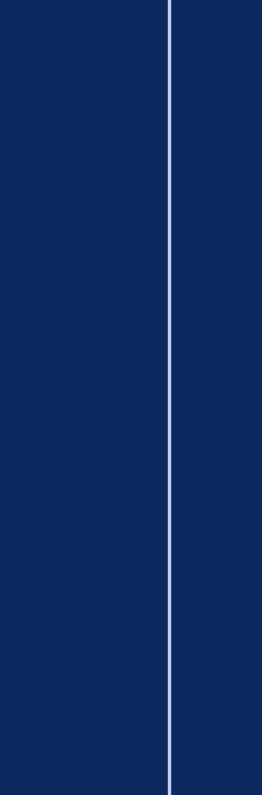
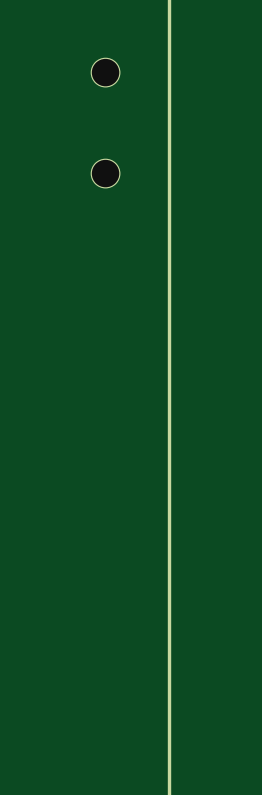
part: none -> (105, 123)

